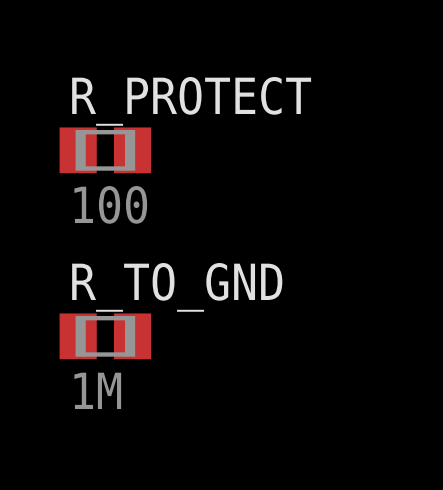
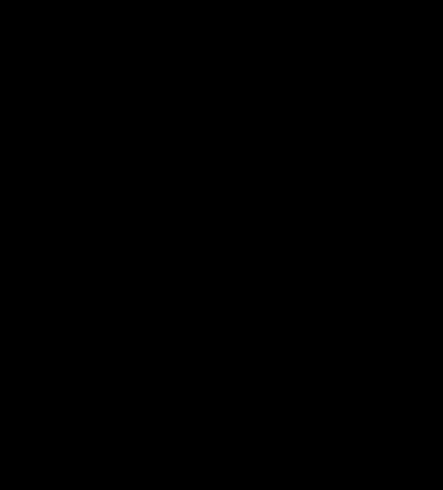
R_PROTECT: 100 (105, 150) -> none
R_TO_GND: 1M (105, 336) -> none

